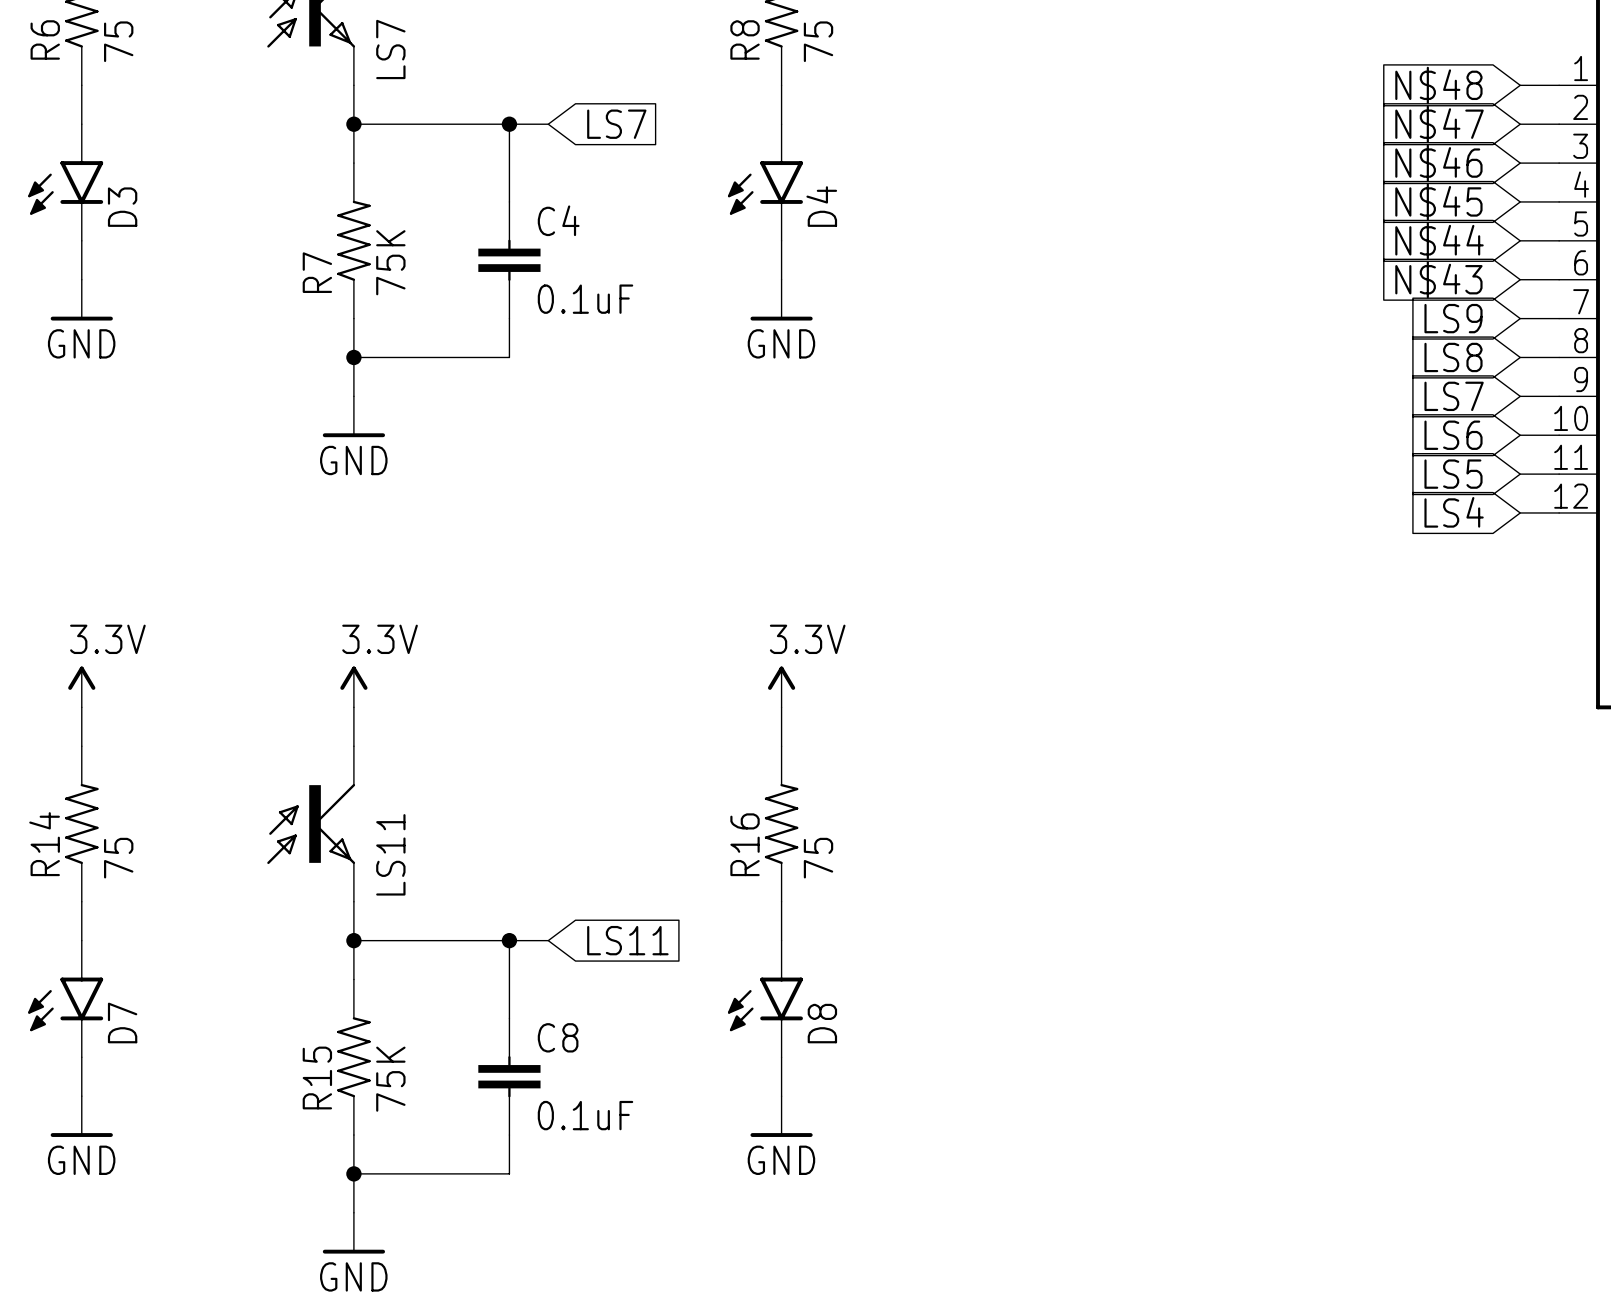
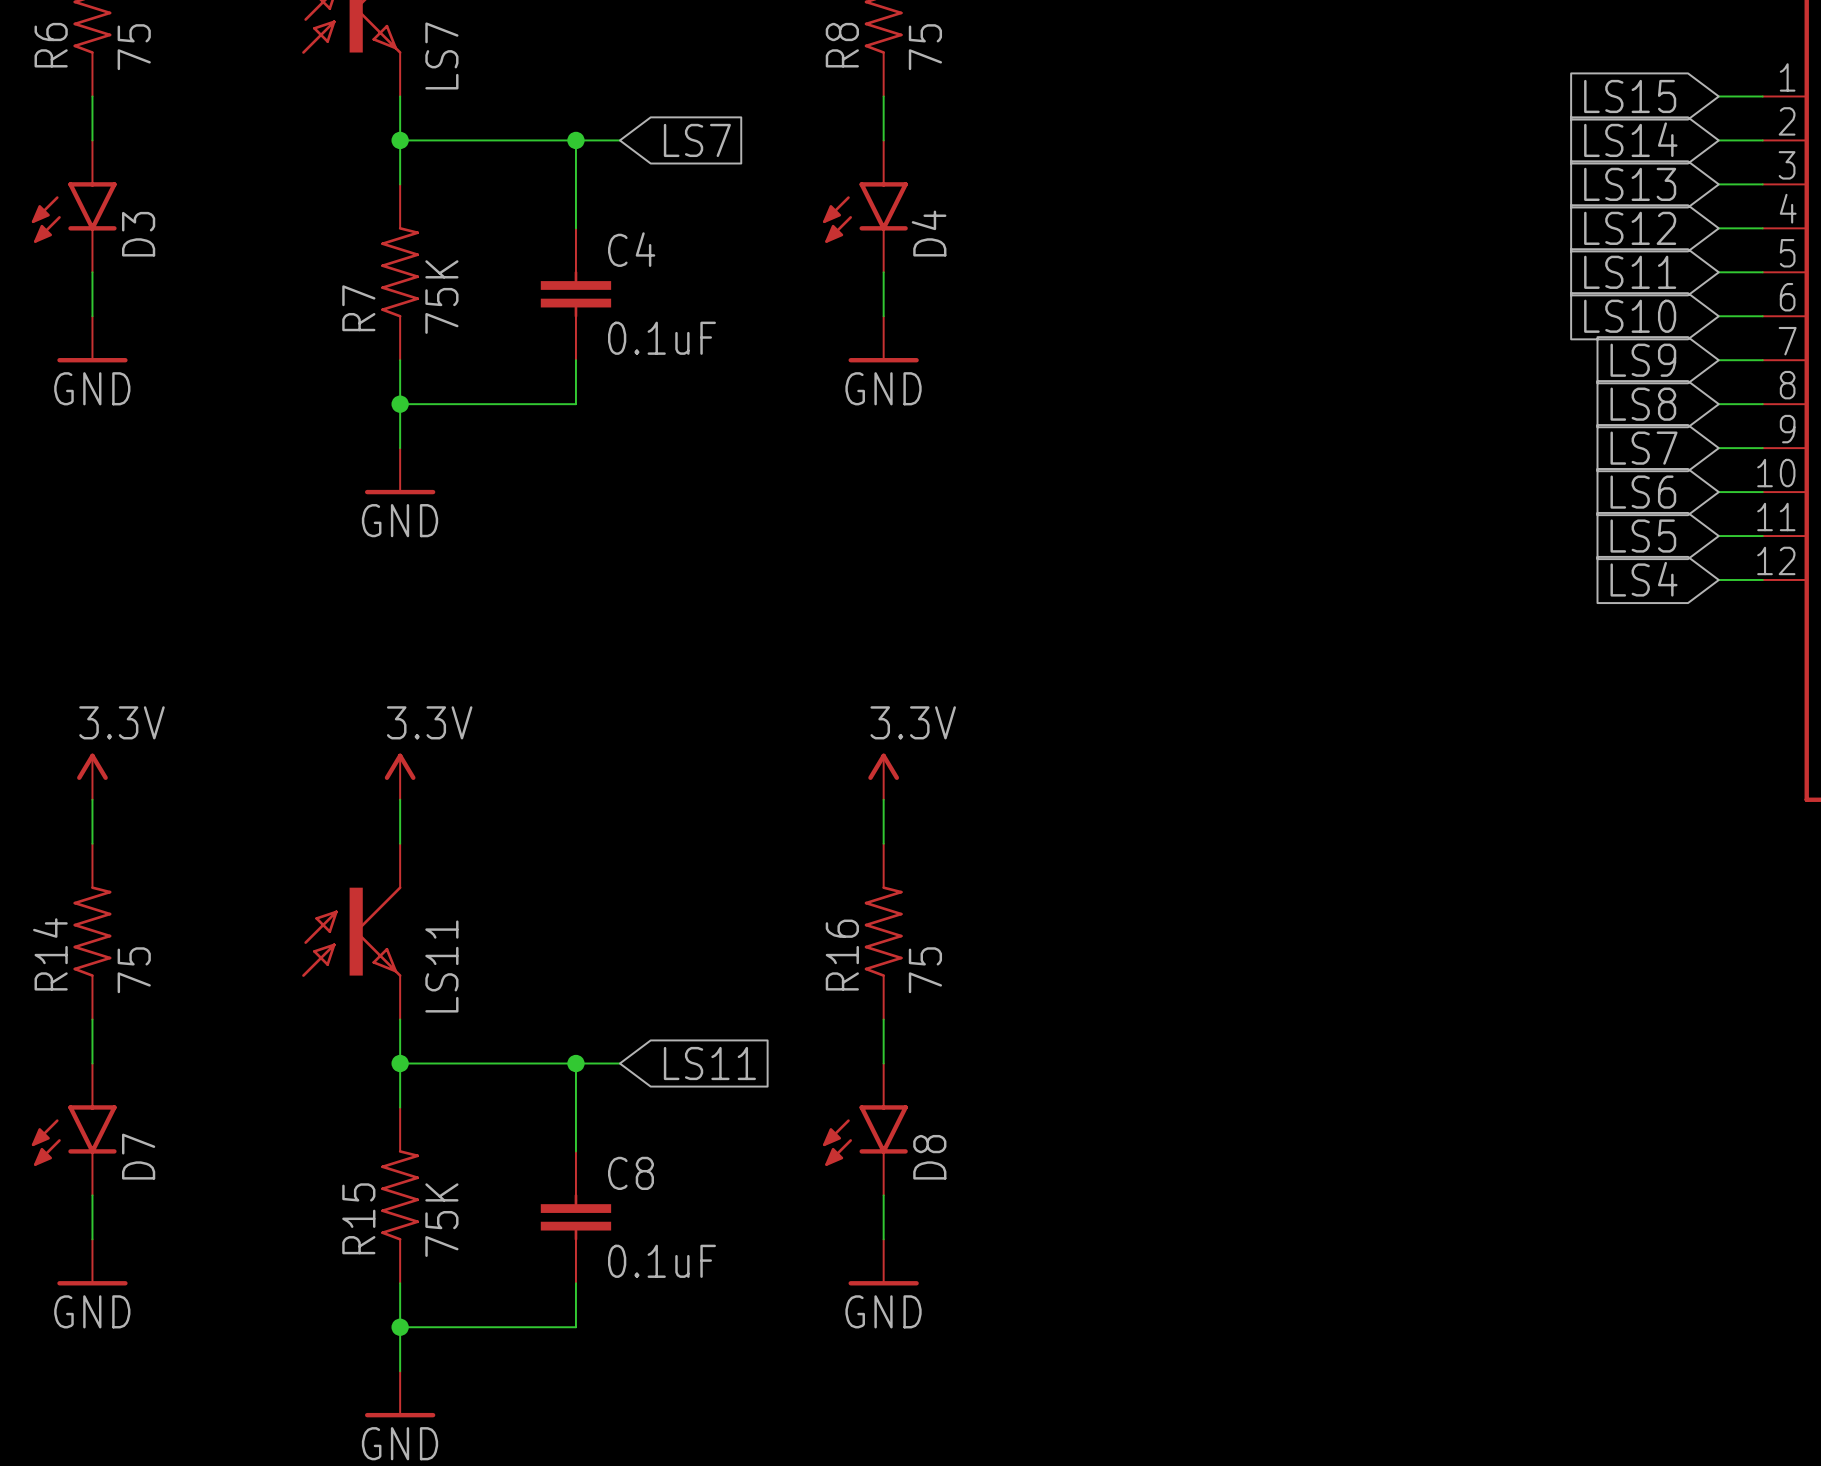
global label: N$48 (1438, 85) -> LS15 (1630, 96)
global label: N$47 (1439, 124) -> LS14 (1630, 139)
global label: N$46 (1438, 163) -> LS13 (1630, 184)
global label: N$45 (1438, 201) -> LS12 (1630, 228)
global label: N$44 (1439, 240) -> LS11 (1630, 272)
global label: N$43 (1438, 279) -> LS10 (1630, 316)

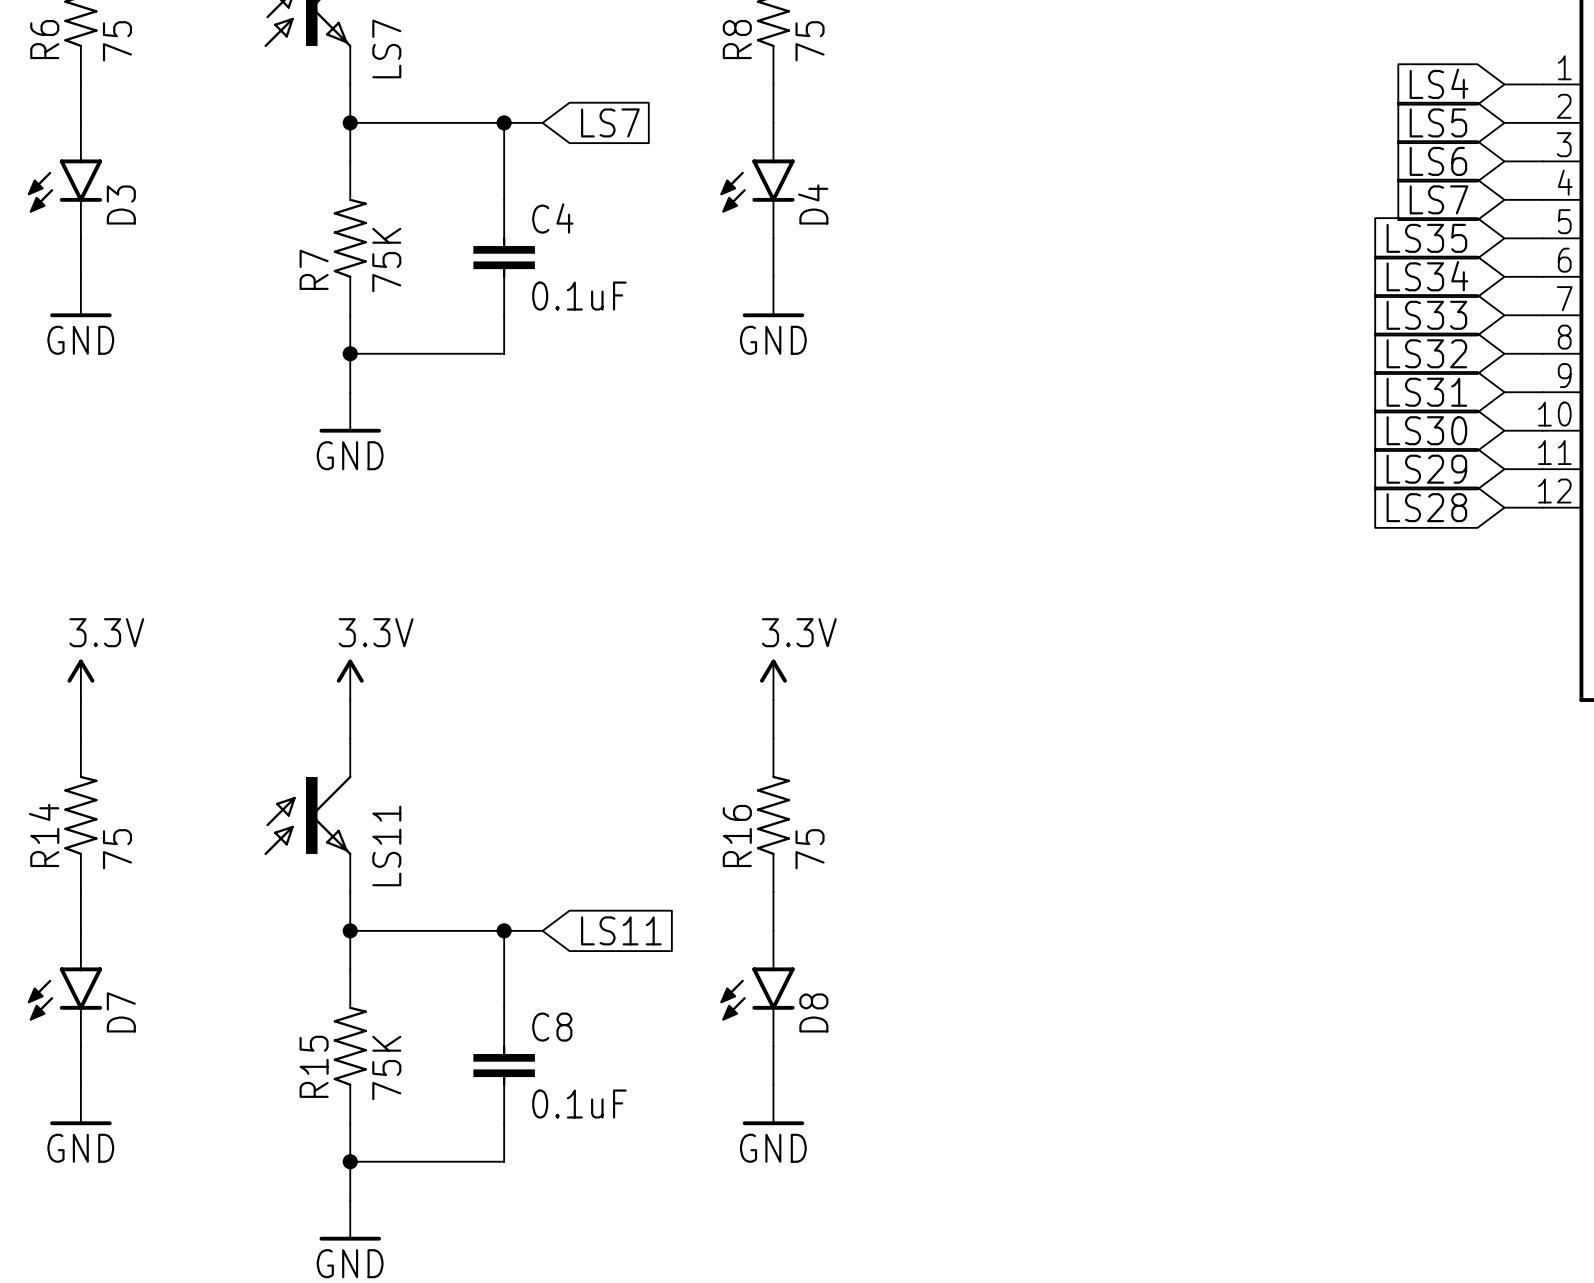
global label: LS15 (1630, 96) -> LS4 (1439, 83)
global label: LS14 (1630, 139) -> LS5 (1438, 122)
global label: LS13 (1630, 184) -> LS6 (1438, 161)
global label: LS12 (1630, 228) -> LS7 (1439, 199)
global label: LS11 (1630, 272) -> LS35 (1426, 238)
global label: LS10 (1630, 316) -> LS34 (1427, 276)
global label: LS9 (1643, 360) -> LS33 (1426, 315)
global label: LS8 (1643, 404) -> LS32 (1426, 353)
global label: LS7 (1644, 448) -> LS31 (1426, 392)
global label: LS6 (1643, 492) -> LS30 (1426, 430)
global label: LS5 (1643, 536) -> LS29 (1426, 469)
global label: LS4 (1644, 579) -> LS28 (1426, 507)

